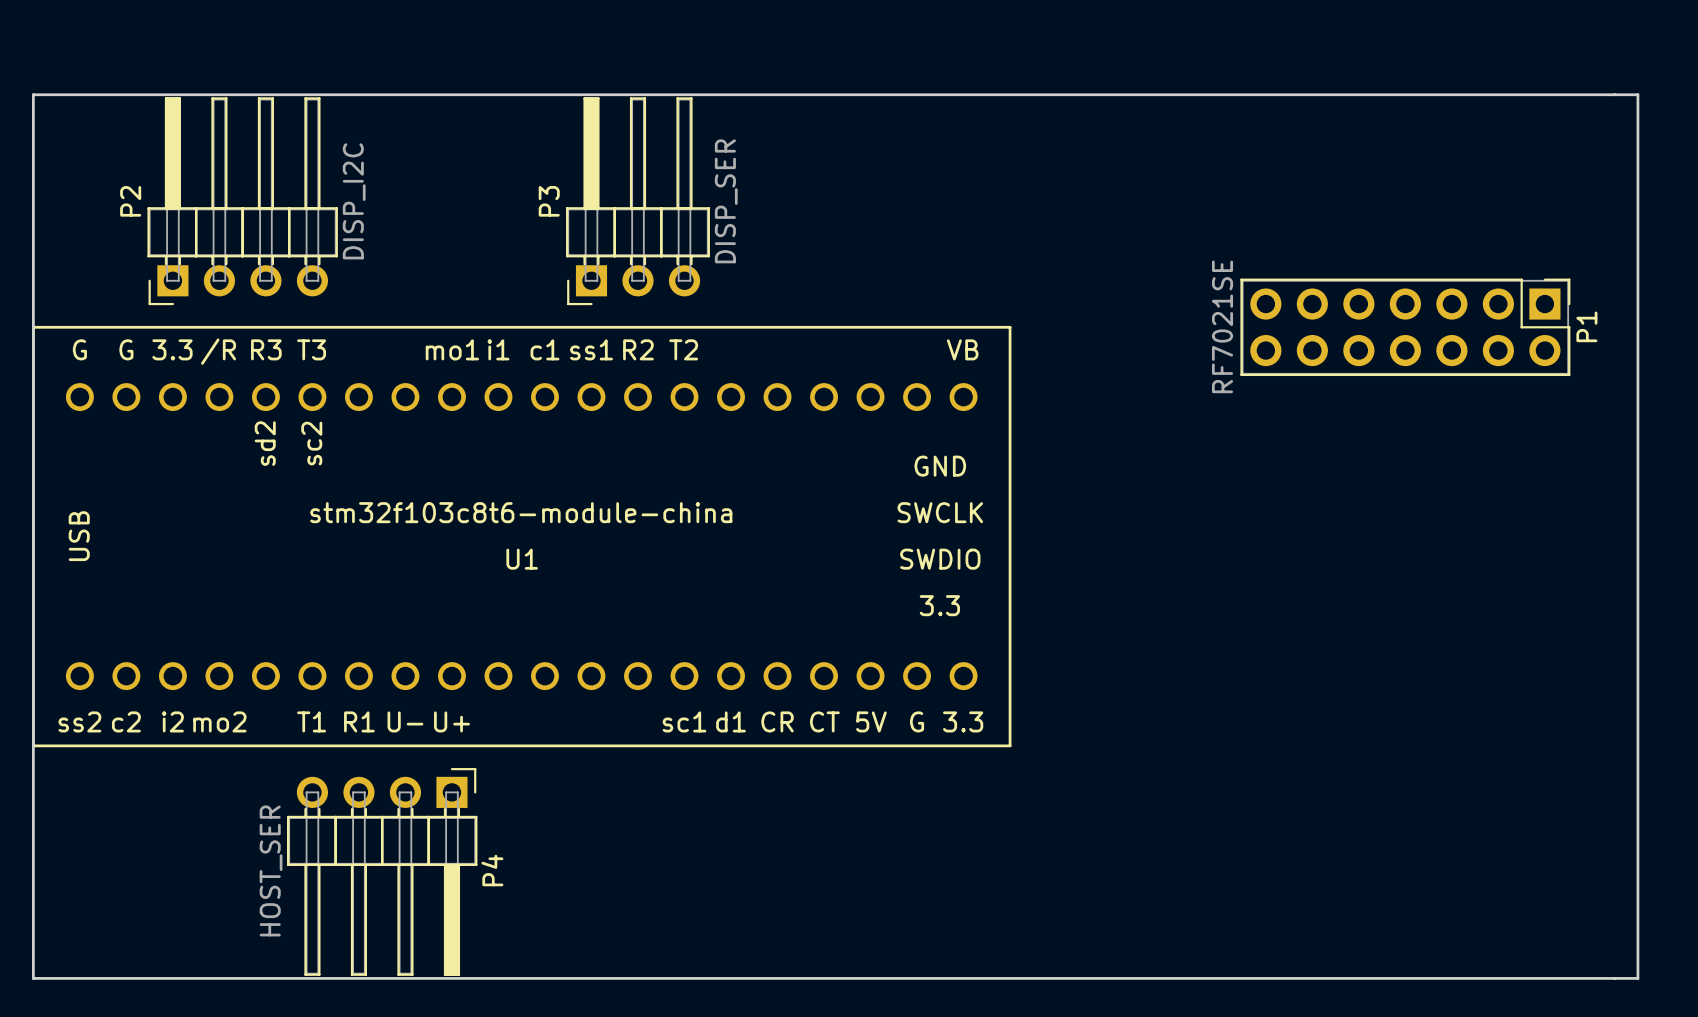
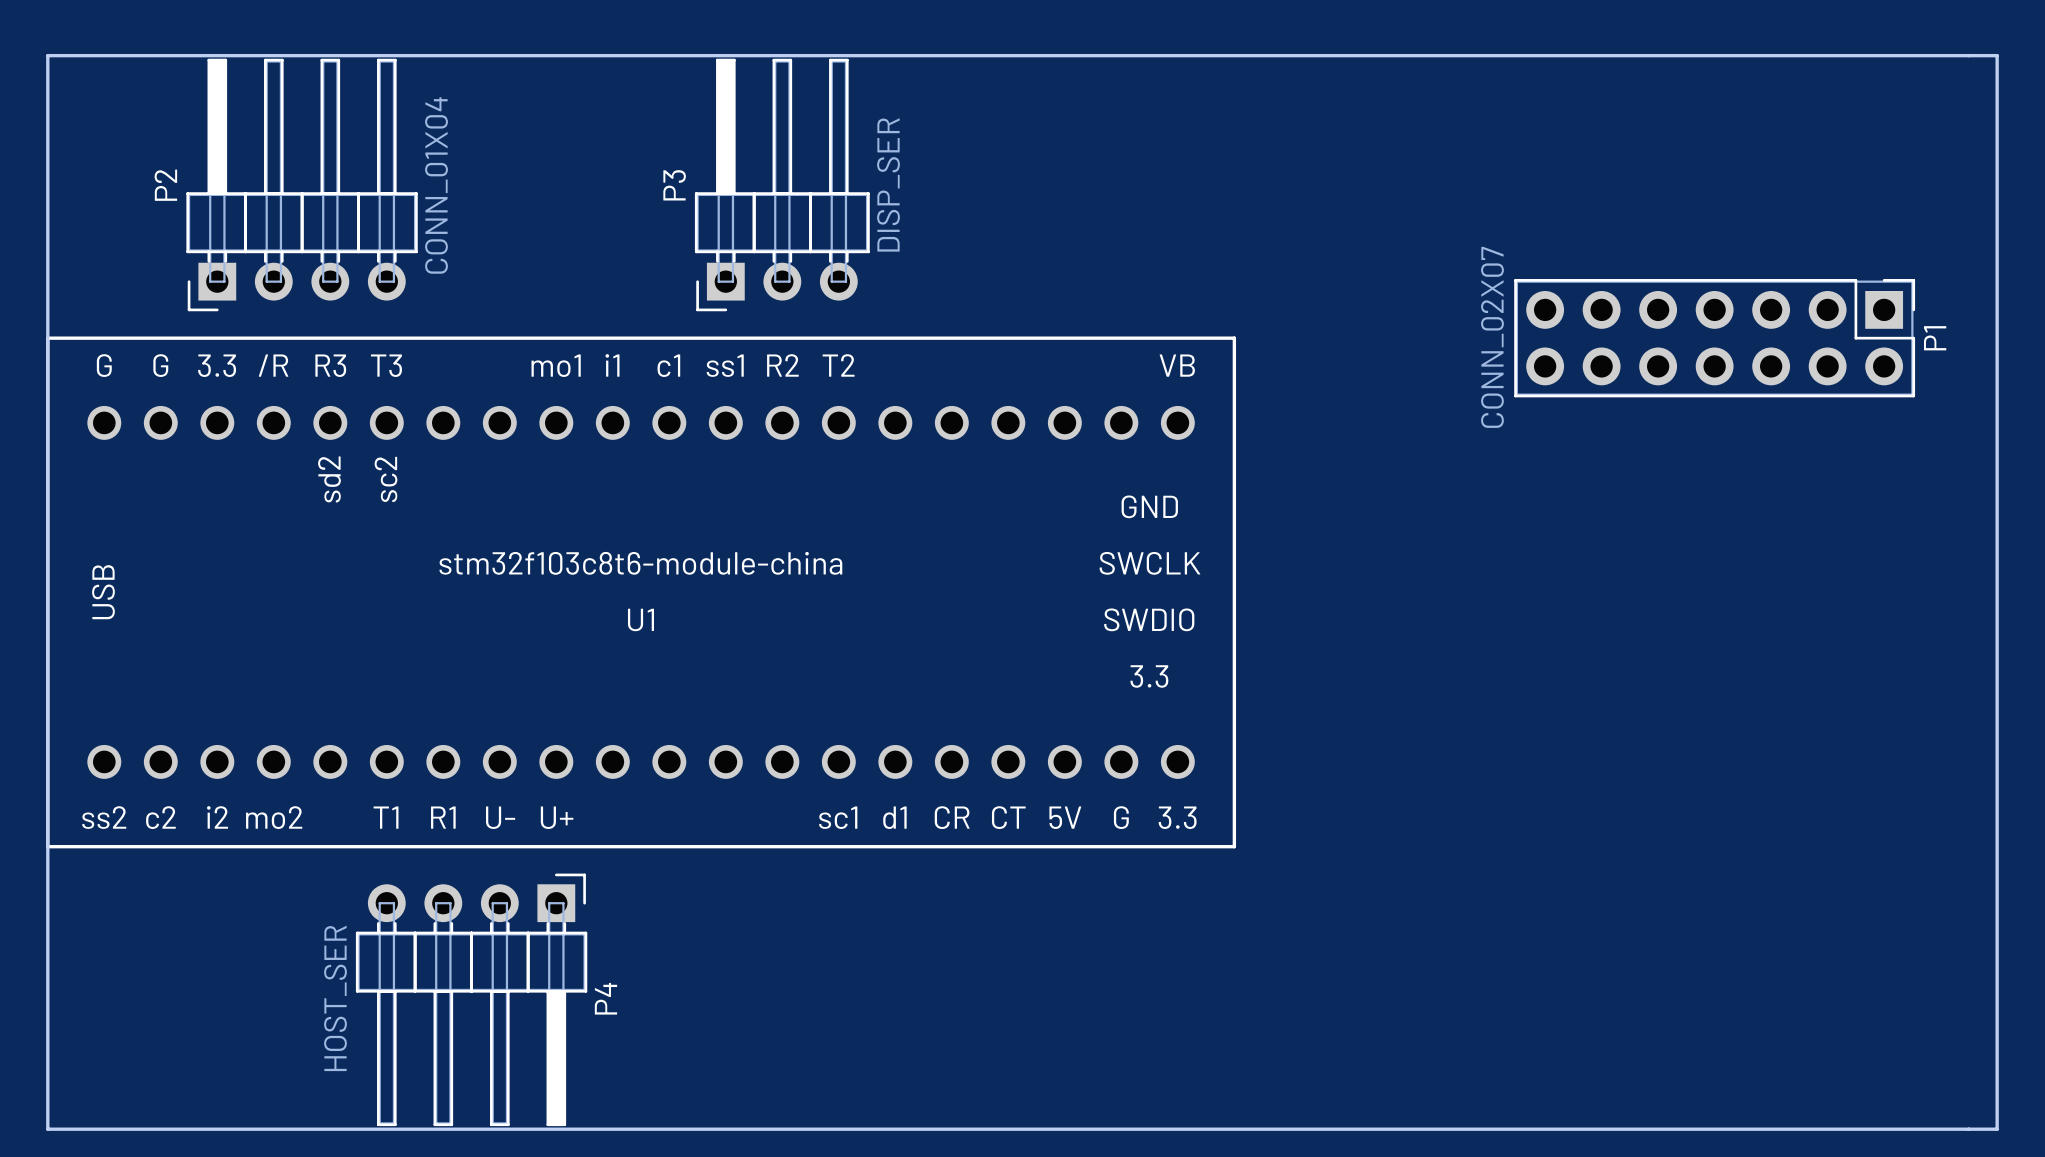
P2 value: DISP_I2C (354, 201) -> CONN_01X04 (436, 185)
P1 value: RF7021SE (1222, 326) -> CONN_02X07 (1492, 337)

